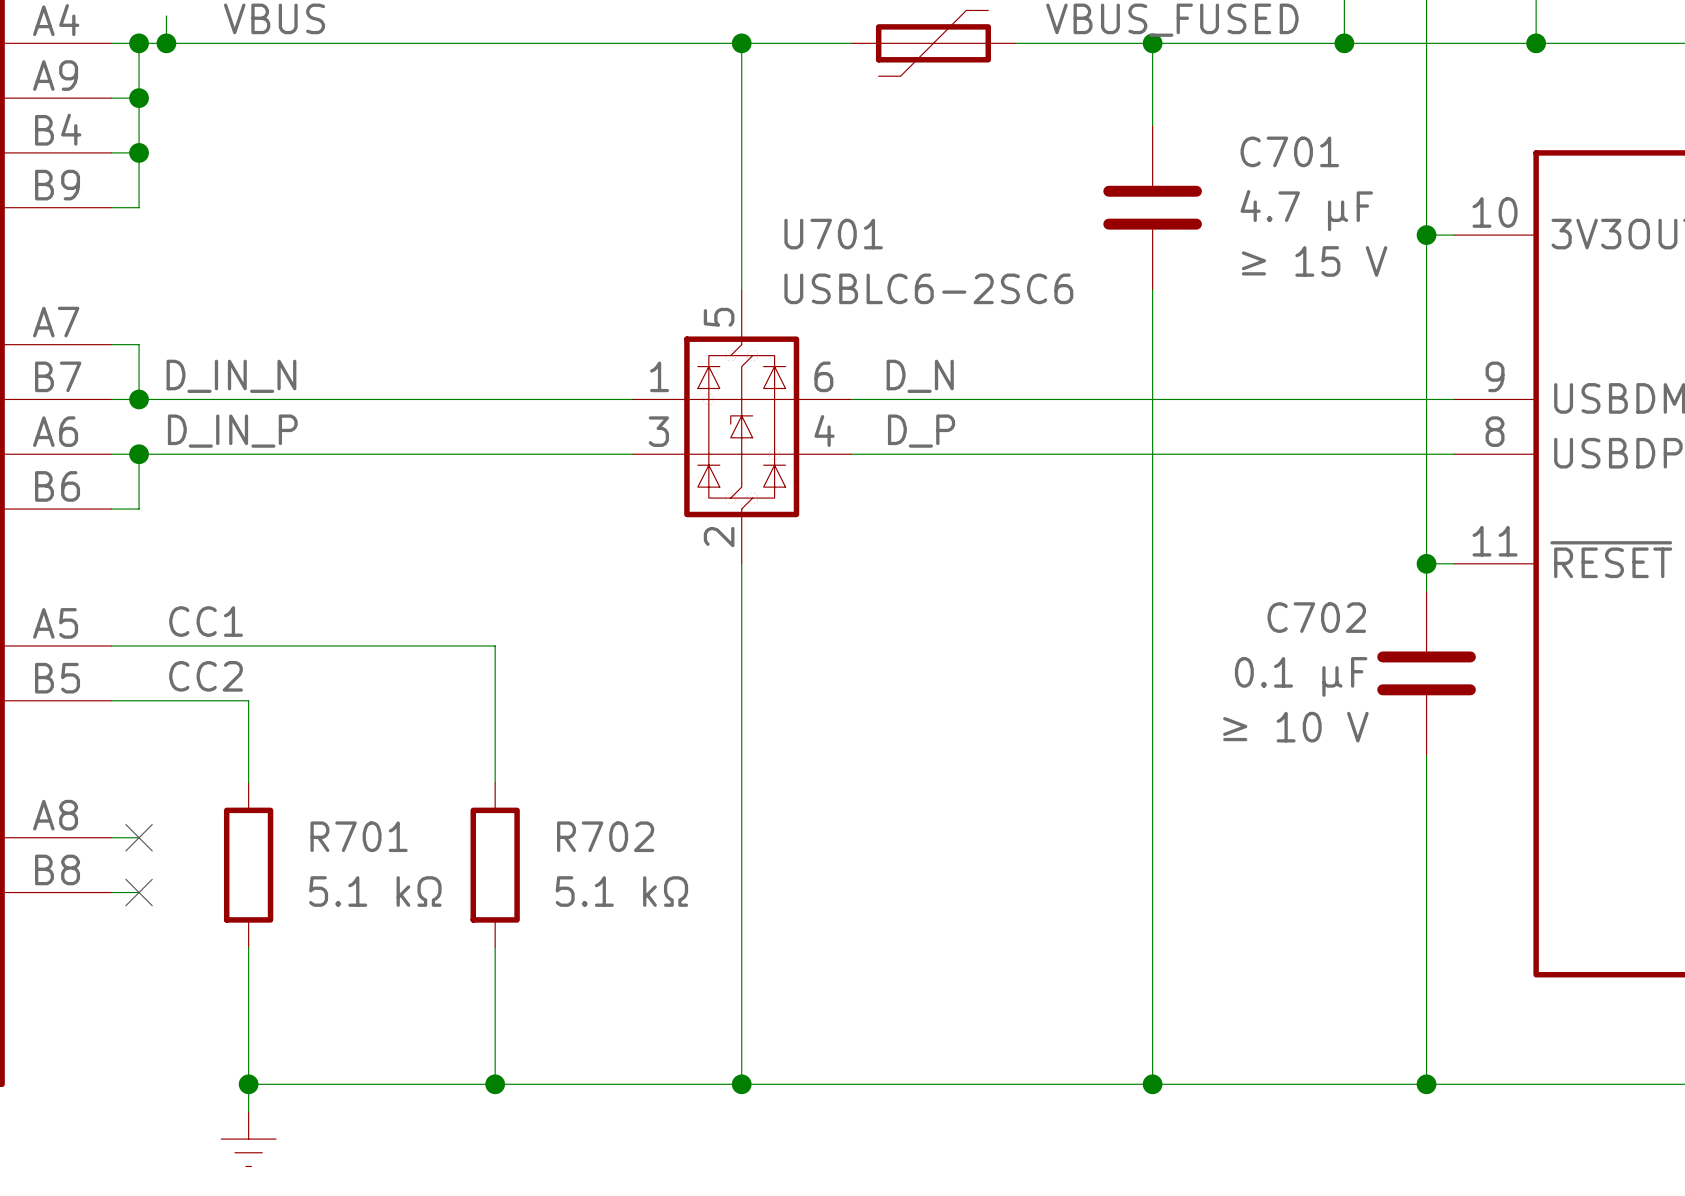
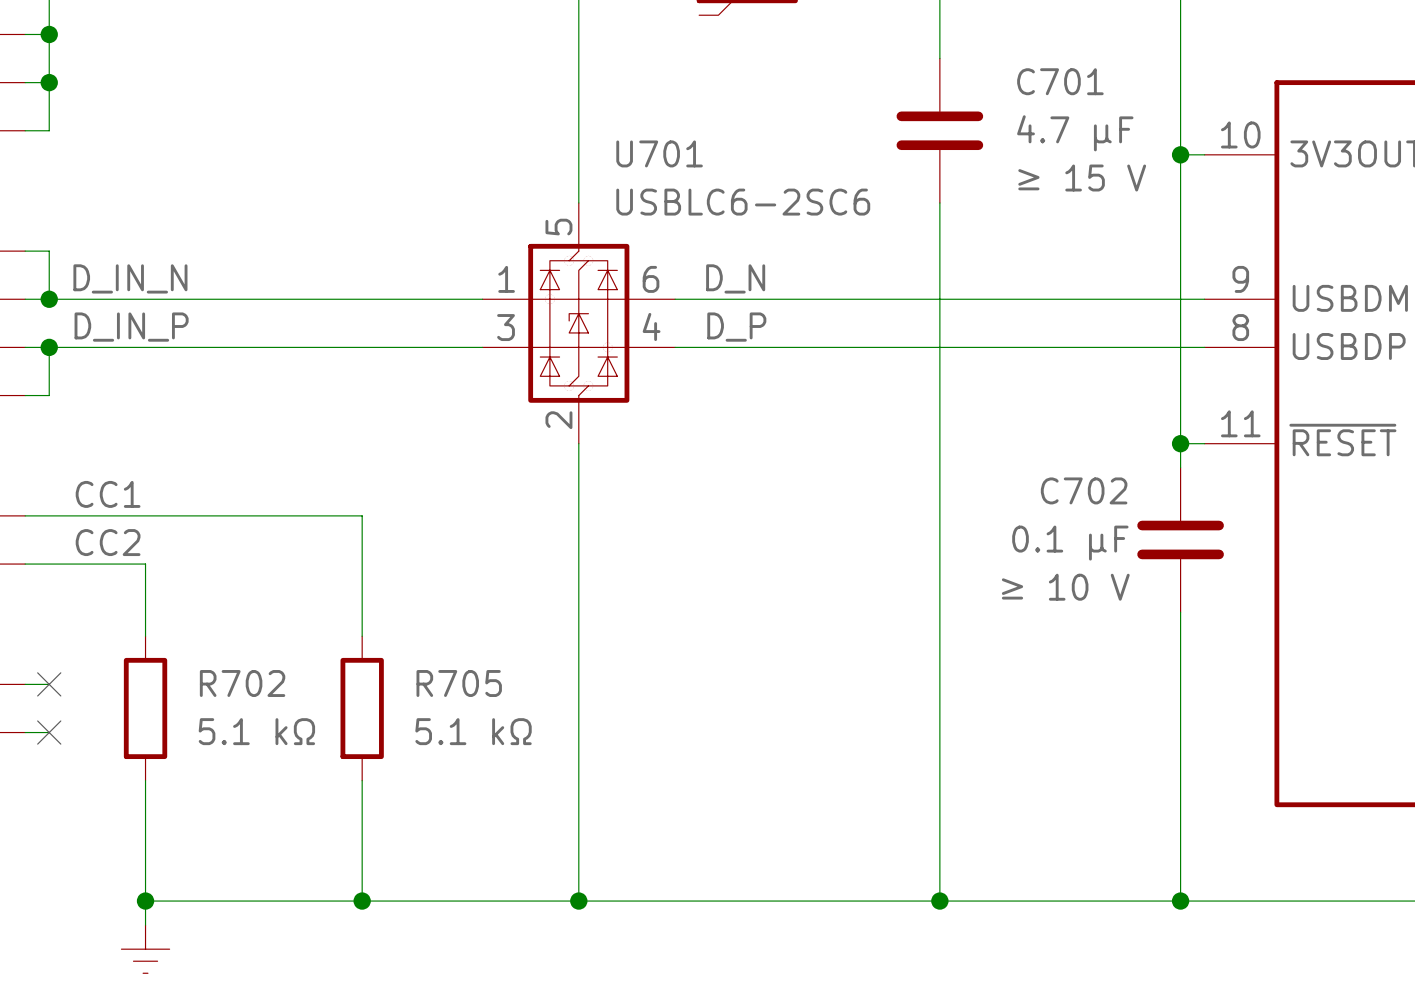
R701 name: R701 (359, 836) -> R702 (242, 683)
R702 name: R702 (605, 836) -> R705 (459, 683)

